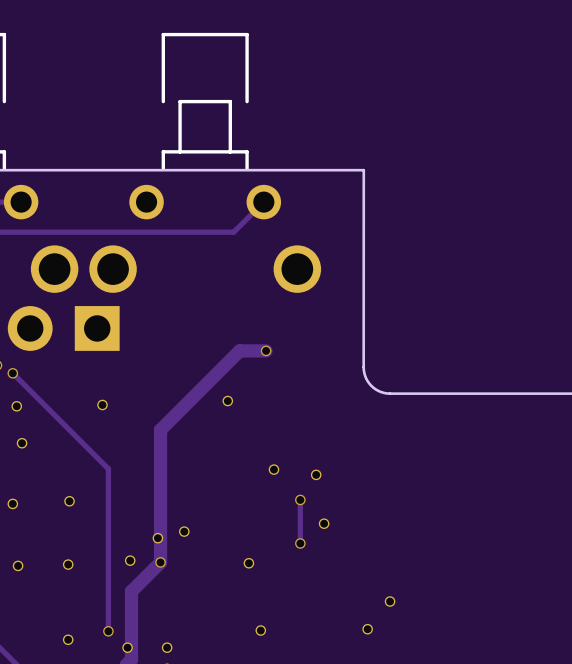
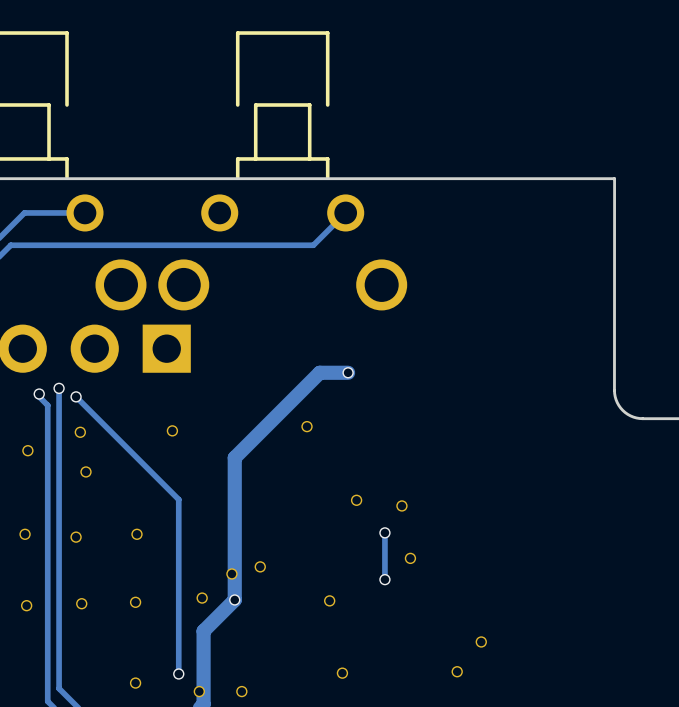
board edge: (363, 170) (363, 367) (369, 383) (376, 389) (387, 393) (540, 393) -> (453, 178) (614, 178) (614, 393) (618, 405) (625, 412) (633, 417) (642, 418)

